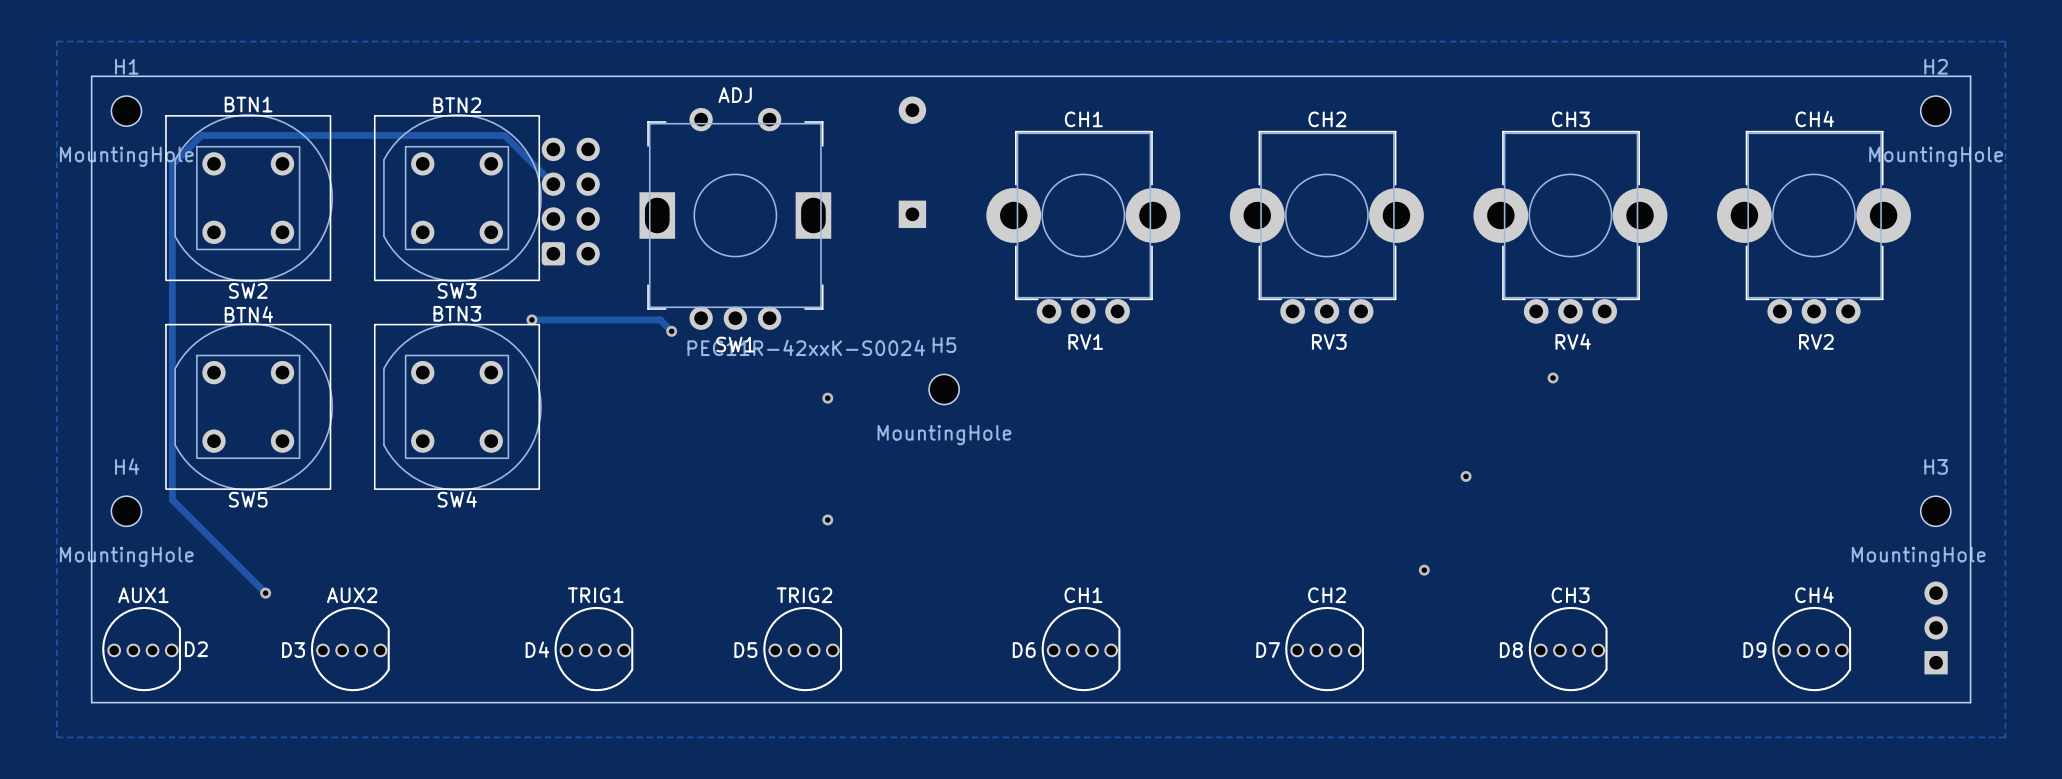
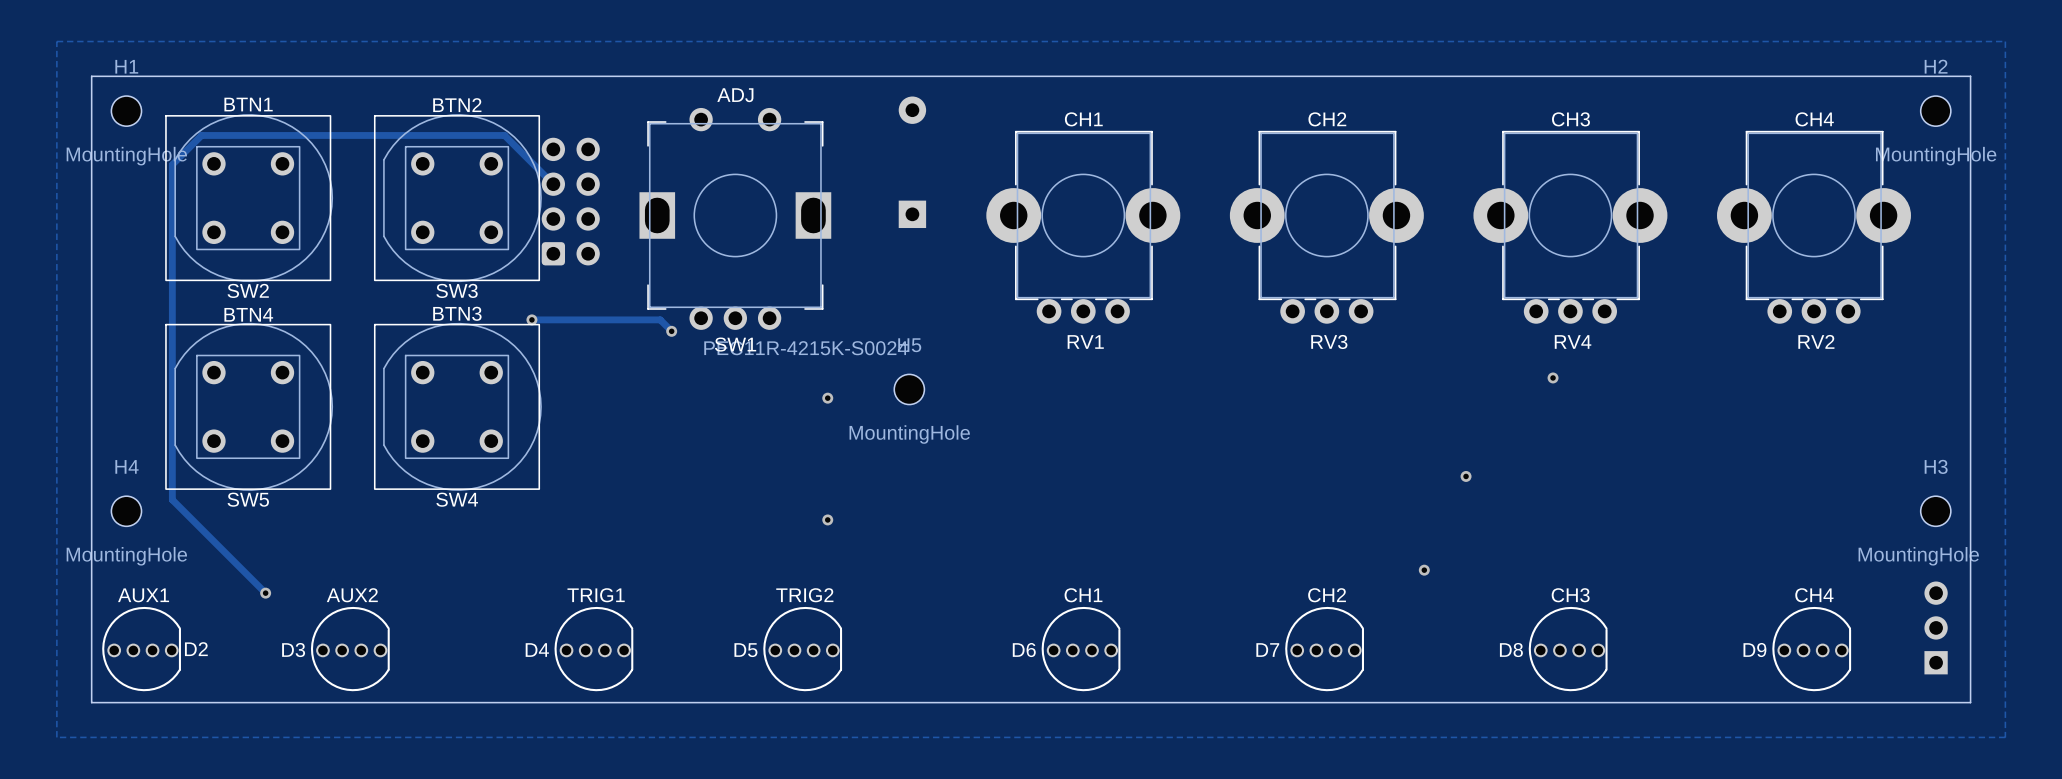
SW1 value: PEC11R-42xxK-S0024 (806, 347) -> PEC11R-4215K-S0024 (806, 348)
H5 position: (944, 389) -> (909, 389)

